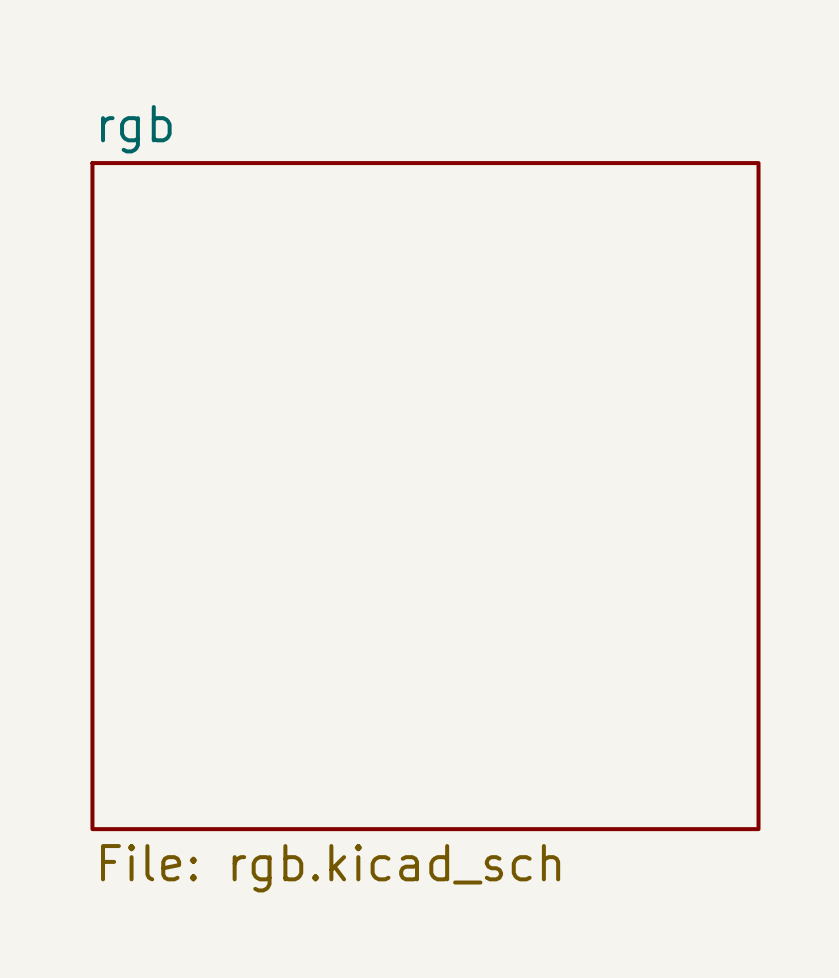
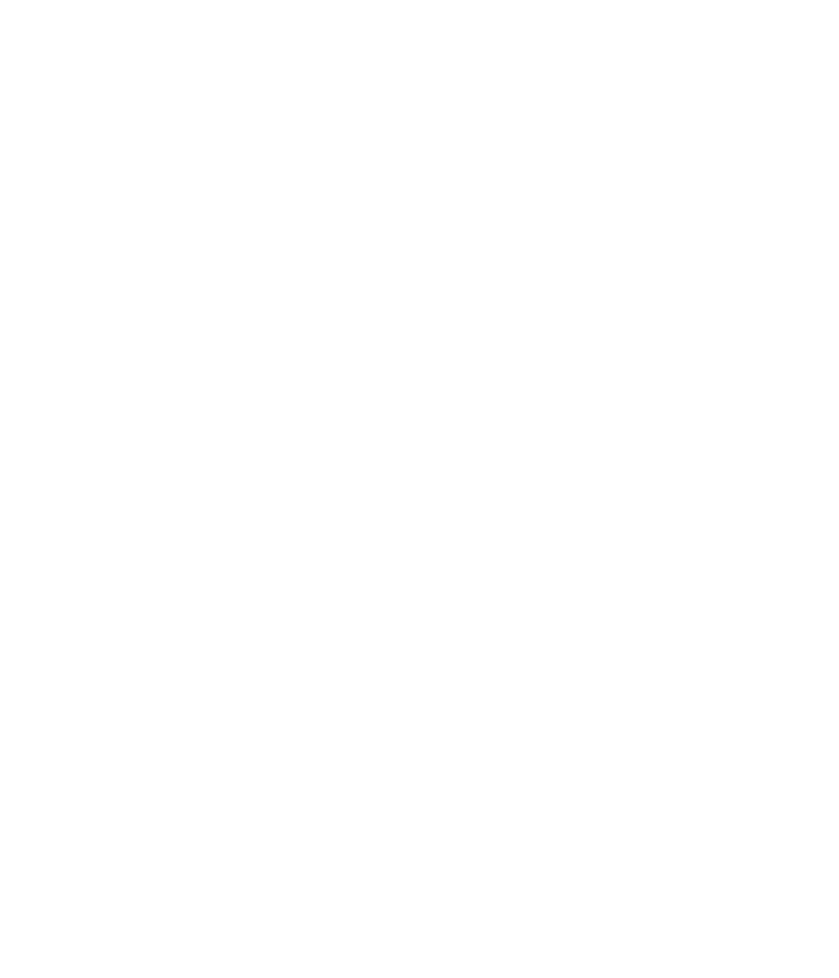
sheet rgb: File: rgb.kicad_sch (425, 496) -> none

